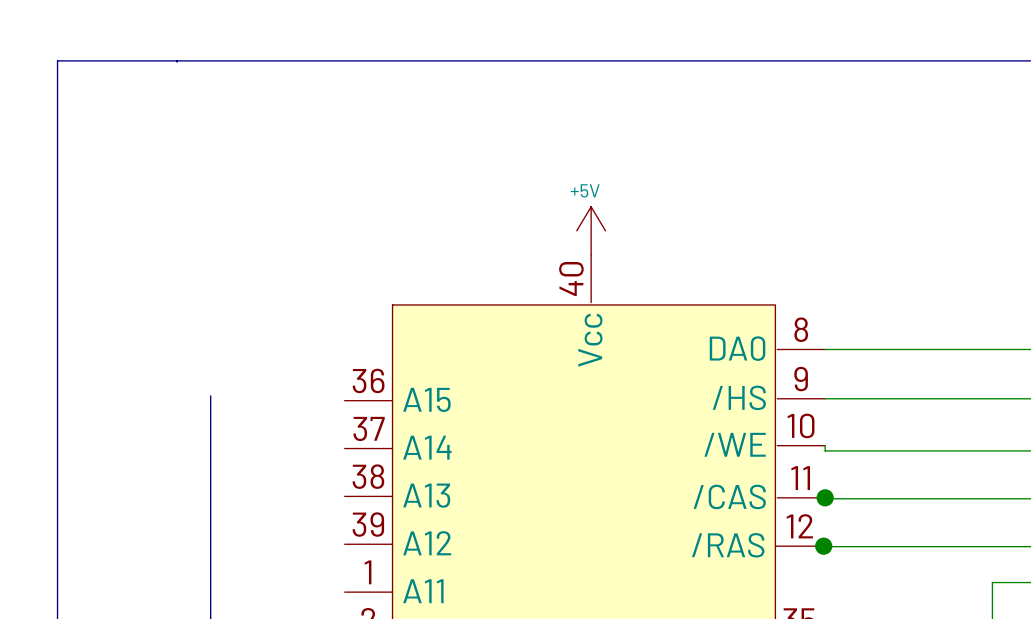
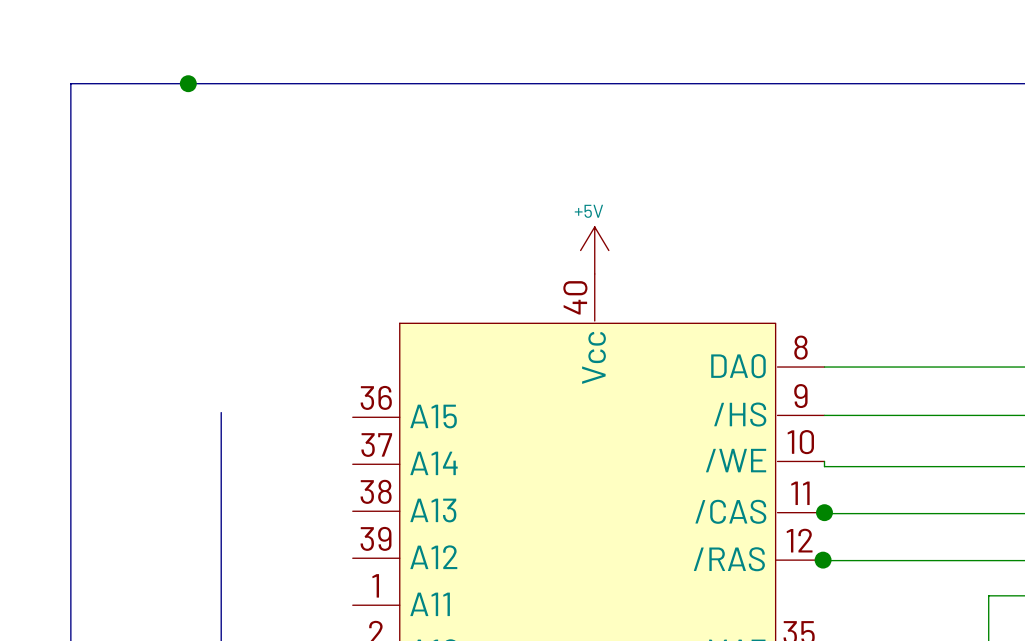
junction: none -> (188, 83)

